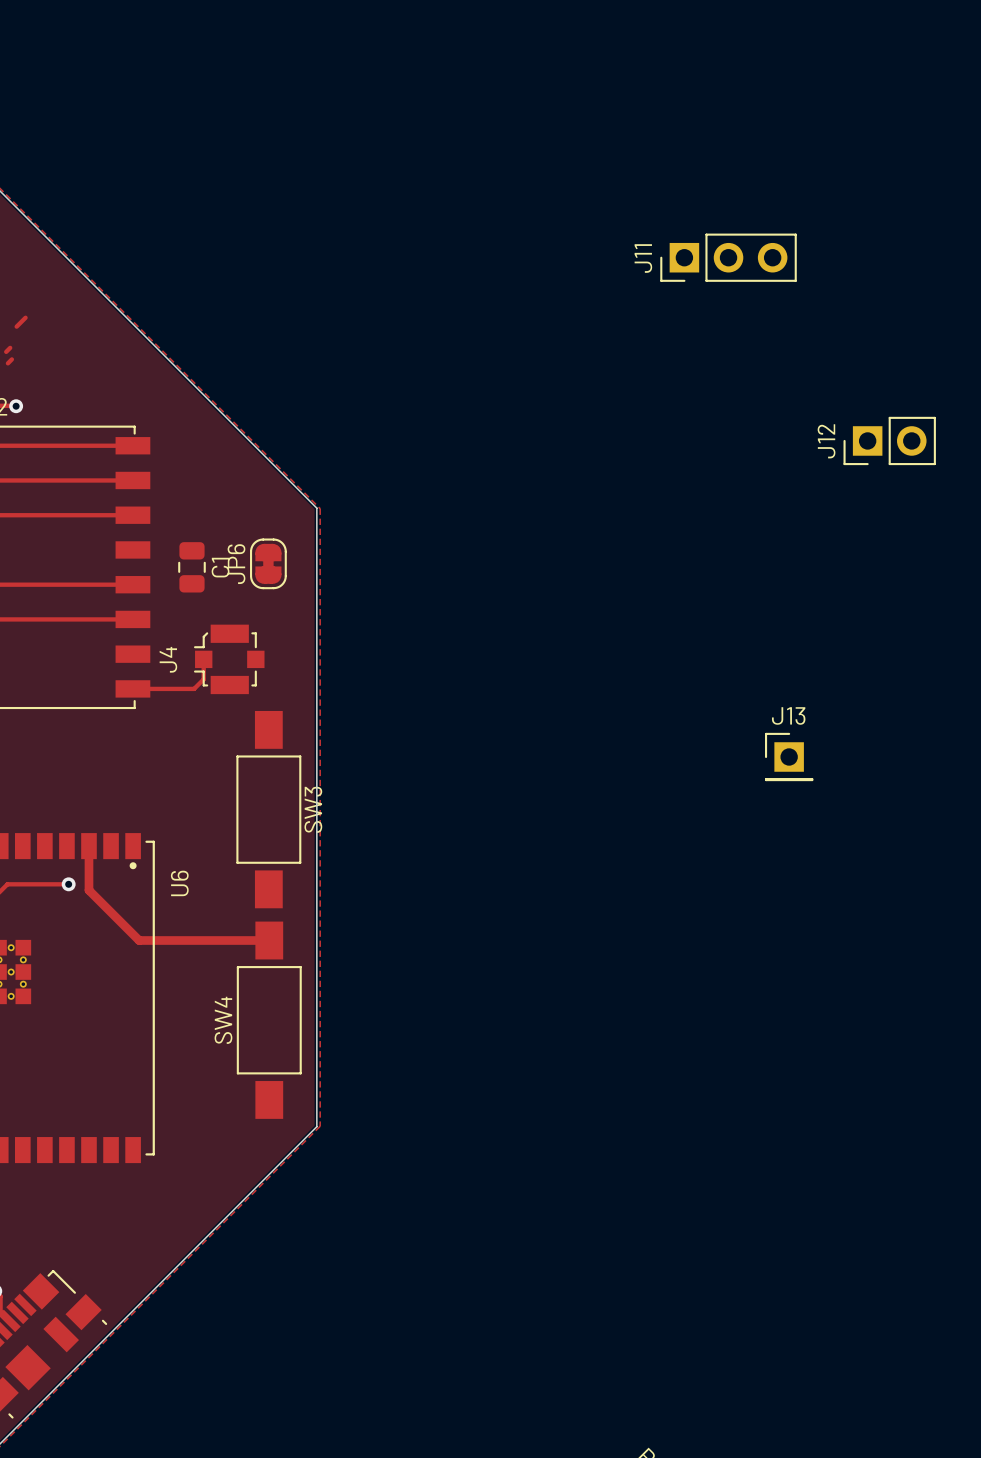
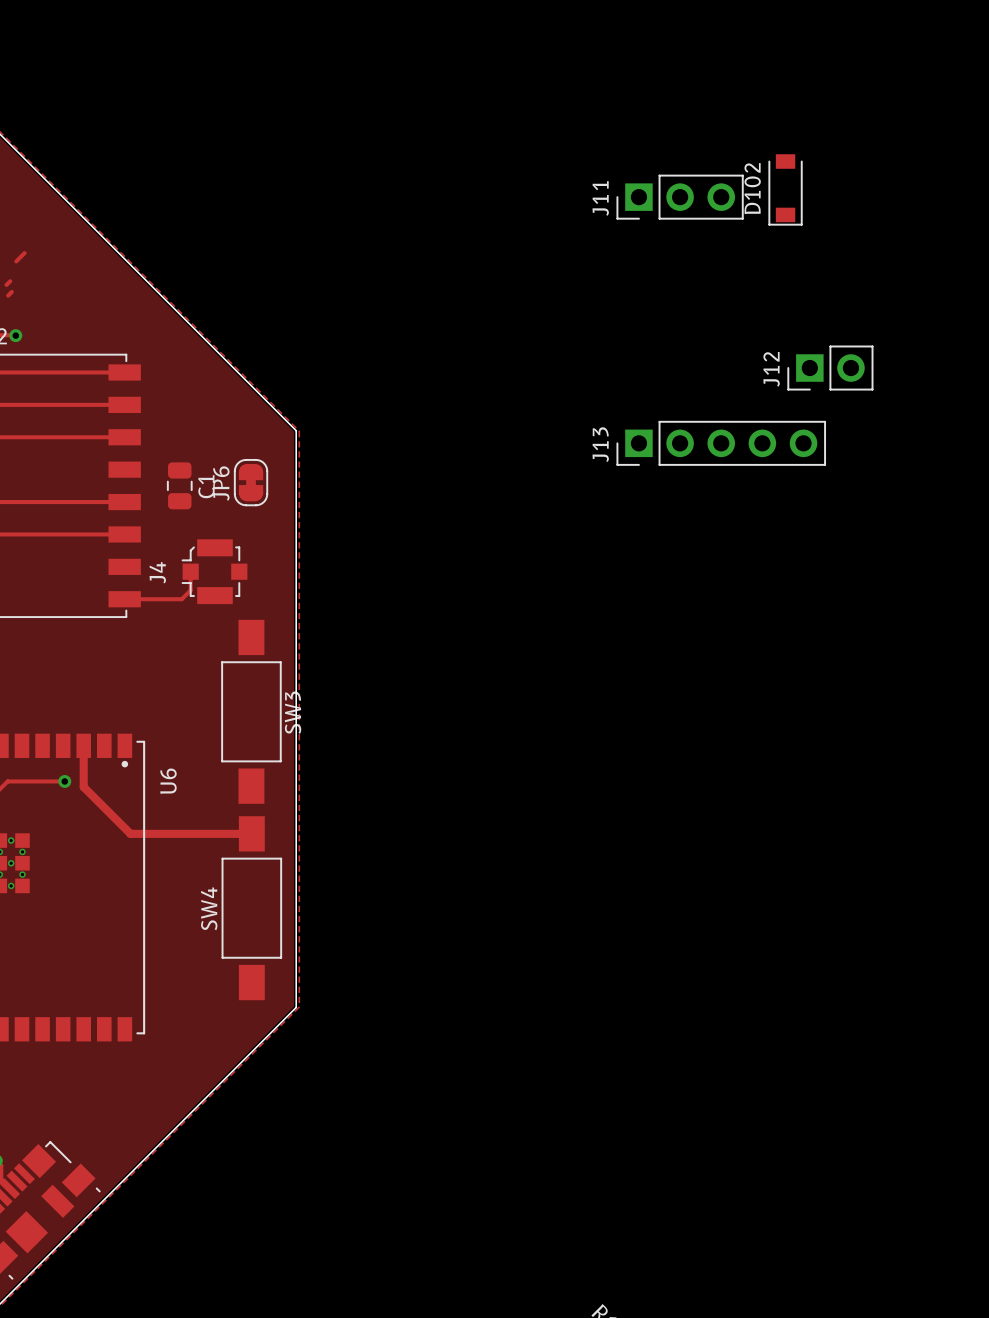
D102: none -> (785, 189)
J13 name position: J13 (788, 715) -> J13 (600, 444)
J13 footprint: [765, 732, 814, 782] -> [616, 420, 827, 466]

